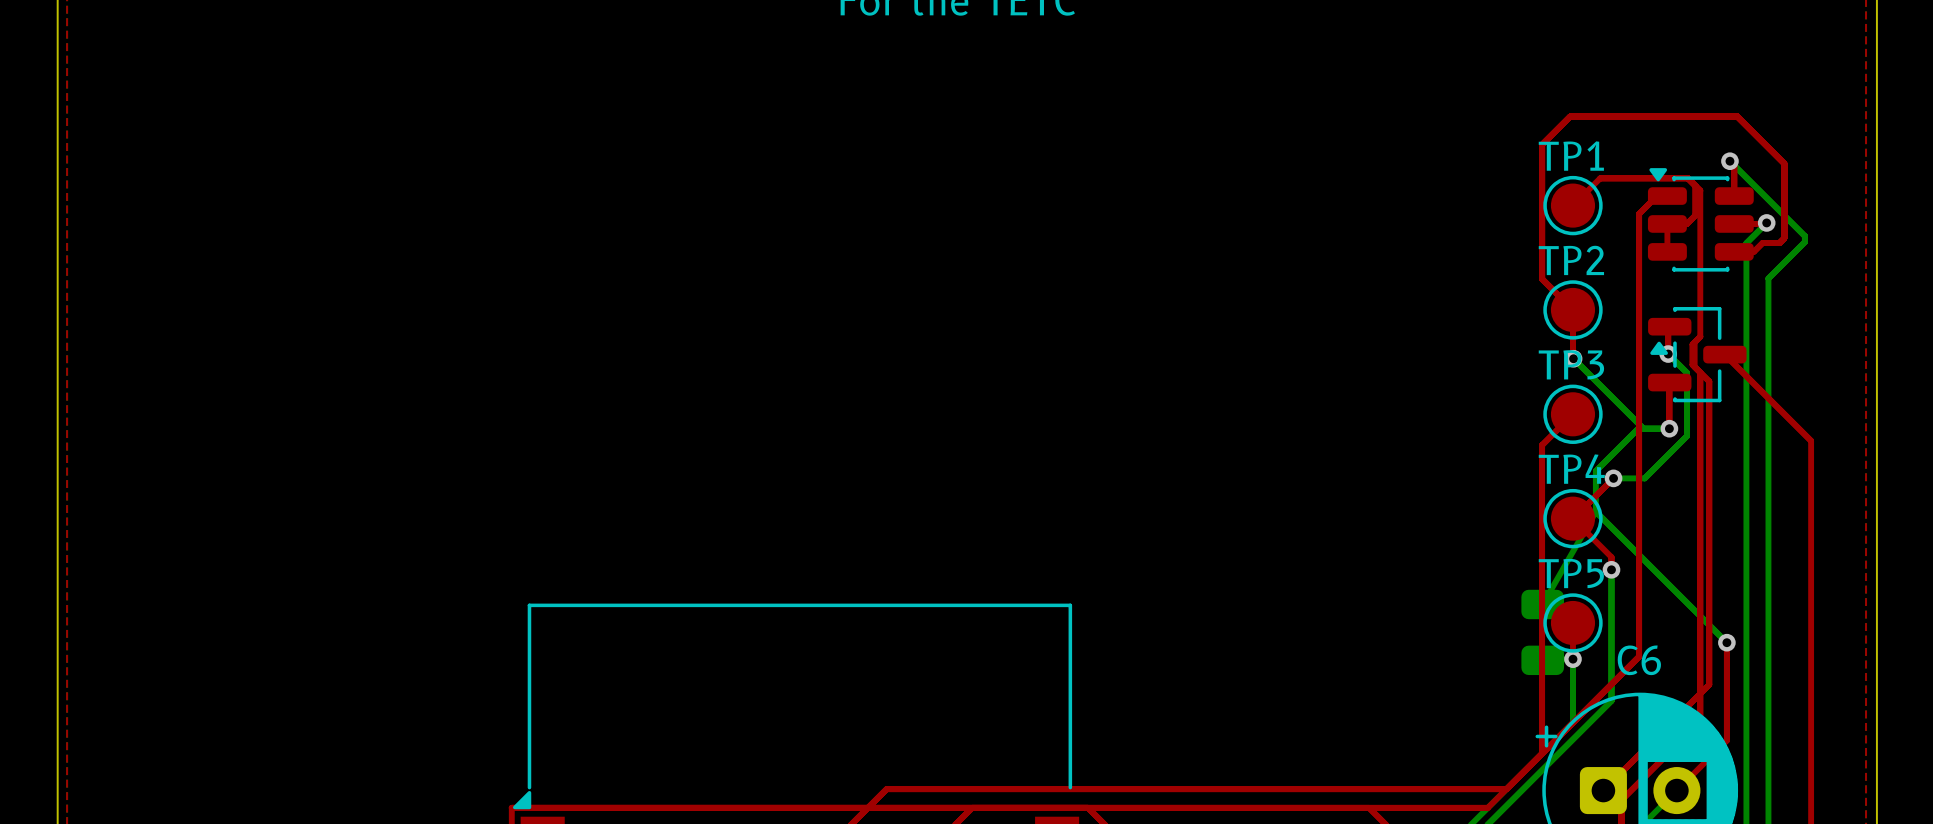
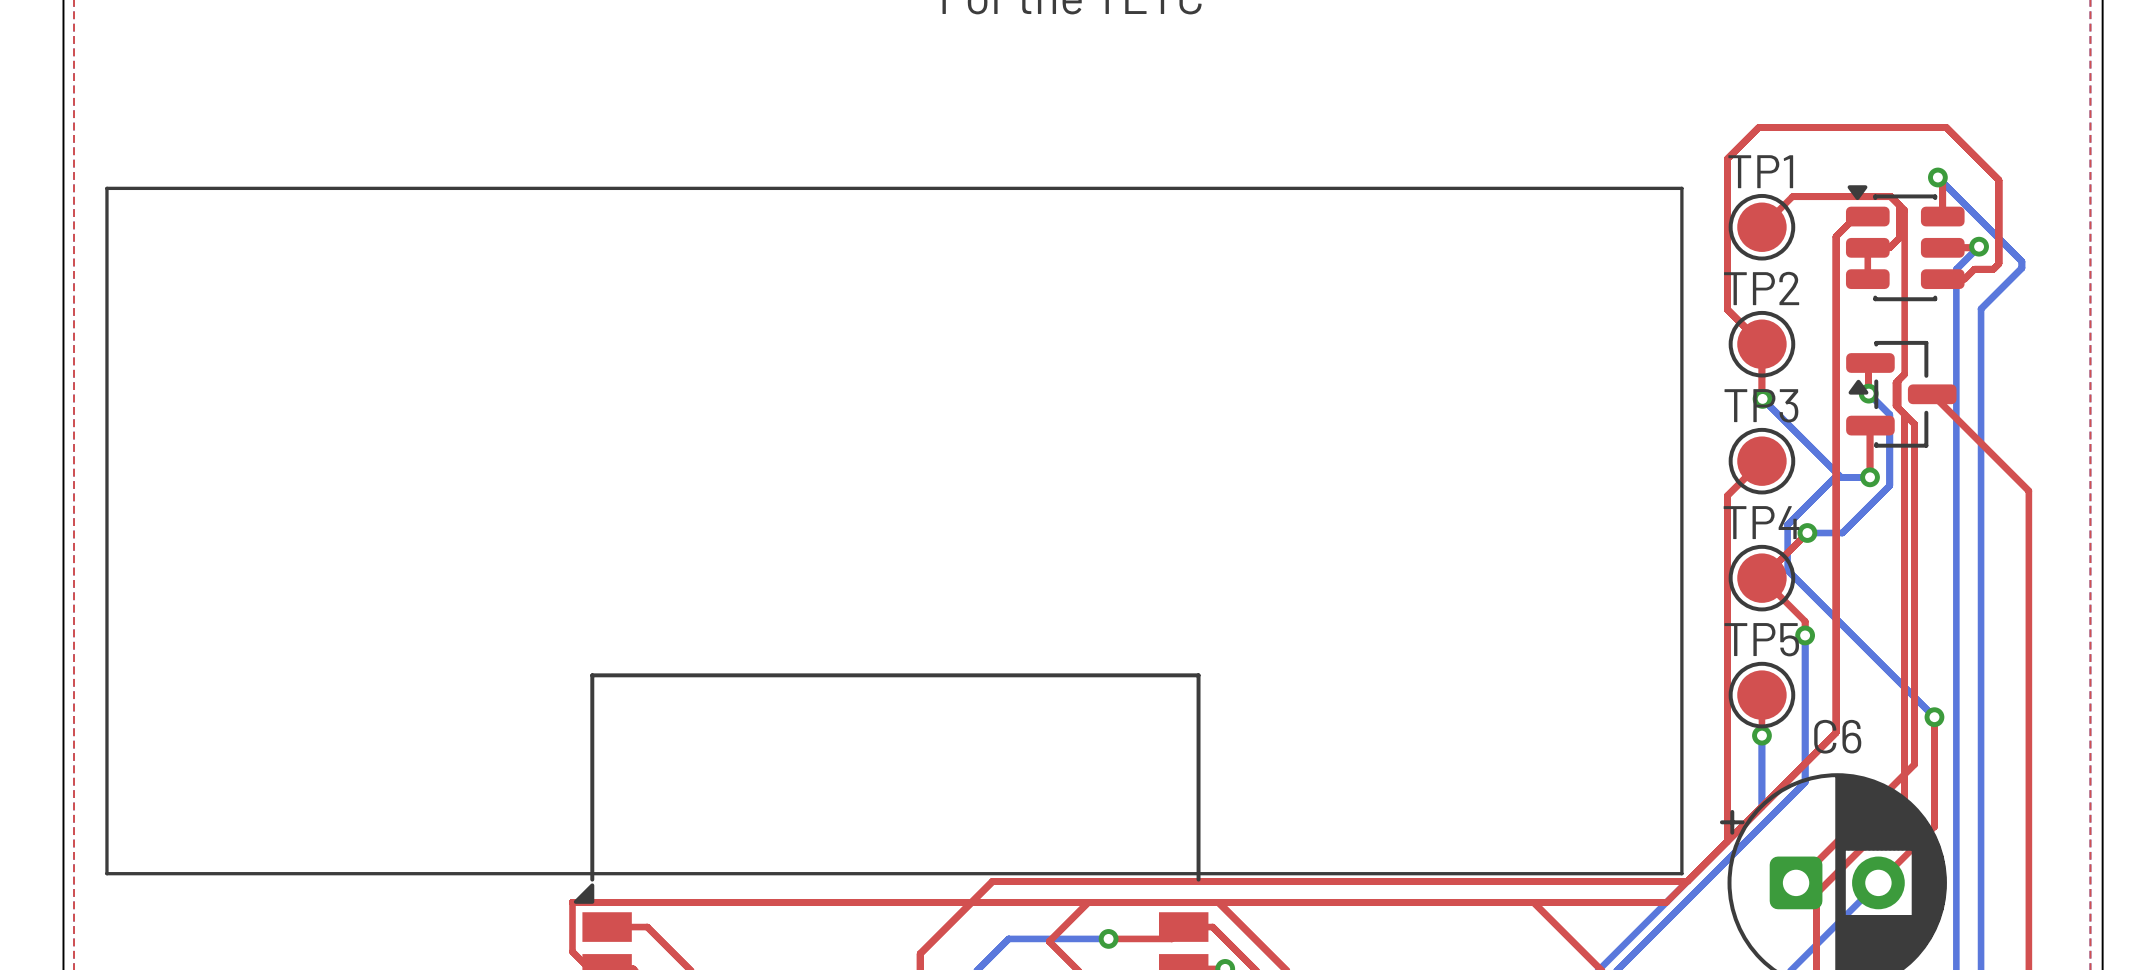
line: none -> (106, 188) (1681, 188) (1681, 873) (106, 873) (106, 188)
bottom track: (1595, 511) (1542, 604) -> none
part: (1542, 632) -> none

